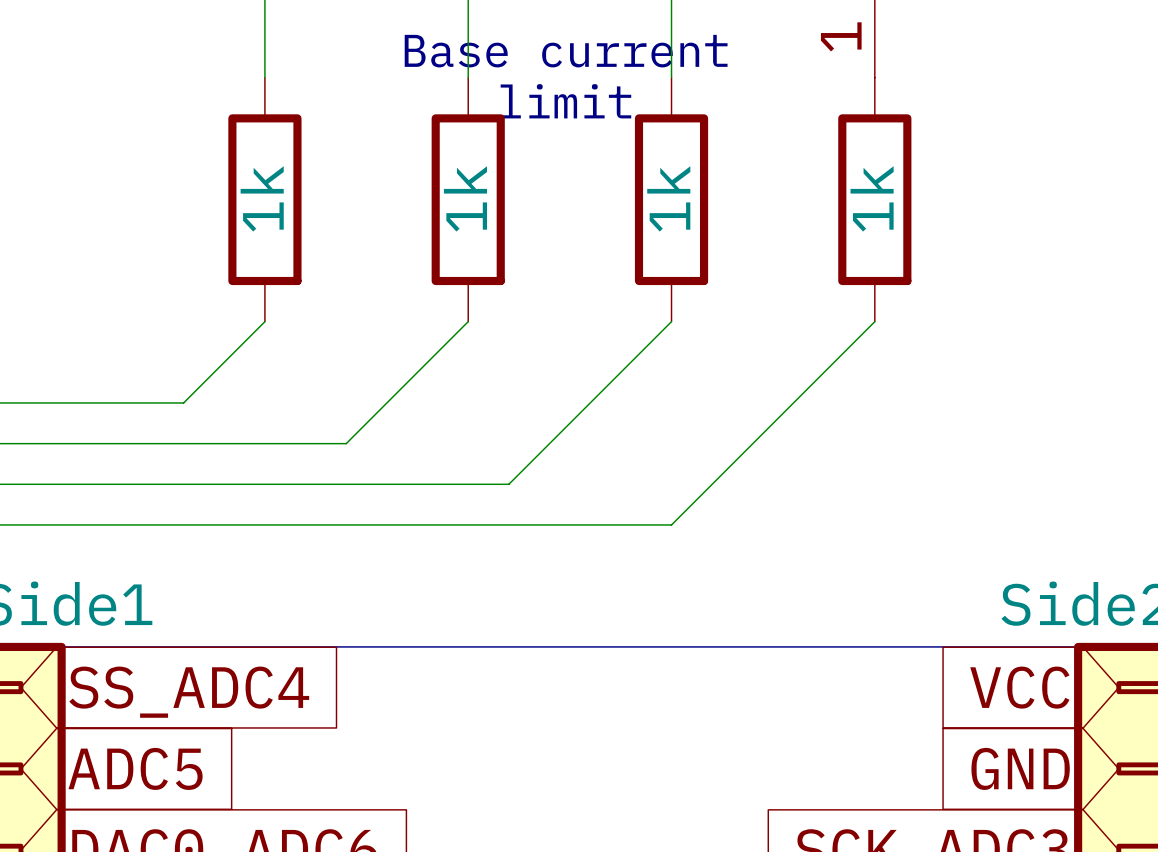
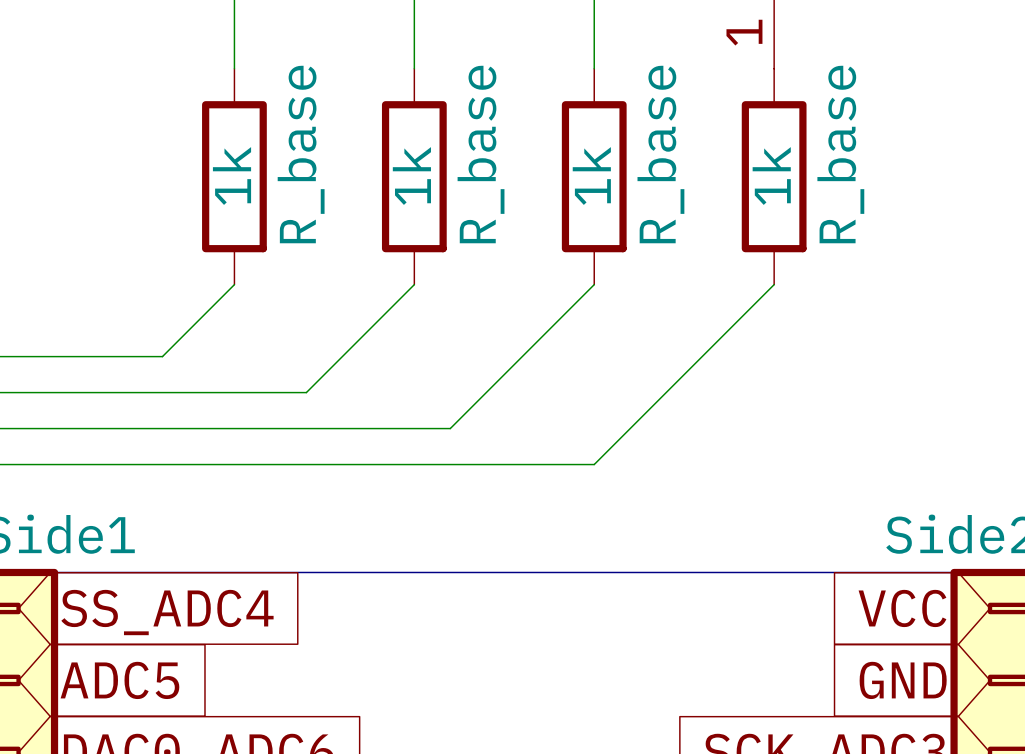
text: Base current (566, 51) -> none
text: limit (565, 101) -> none
1k value: none -> R_base (301, 154)
1k value: none -> R_base (481, 154)
1k value: none -> R_base (660, 154)
1k value: none -> R_base (840, 154)

